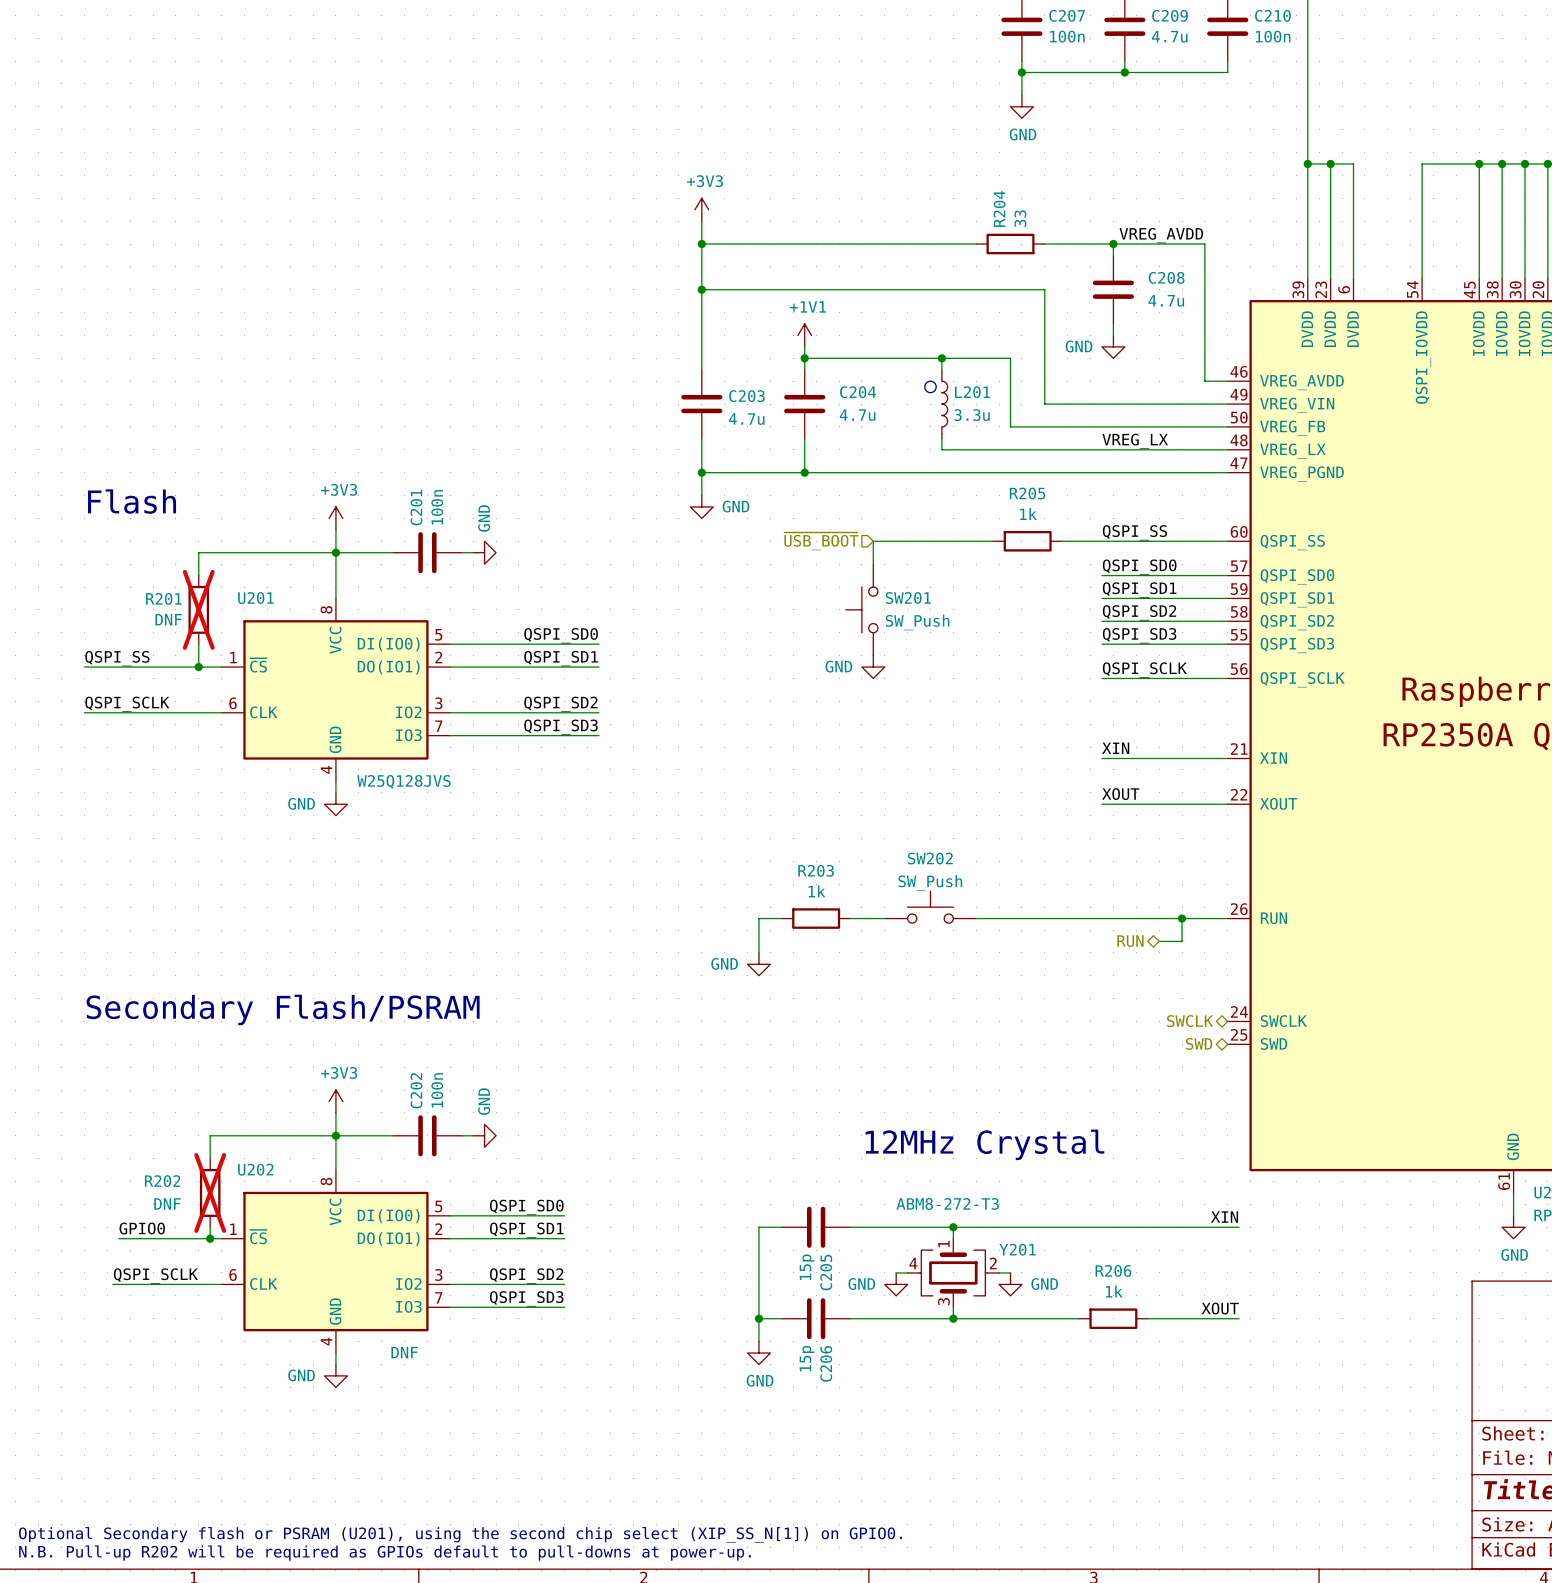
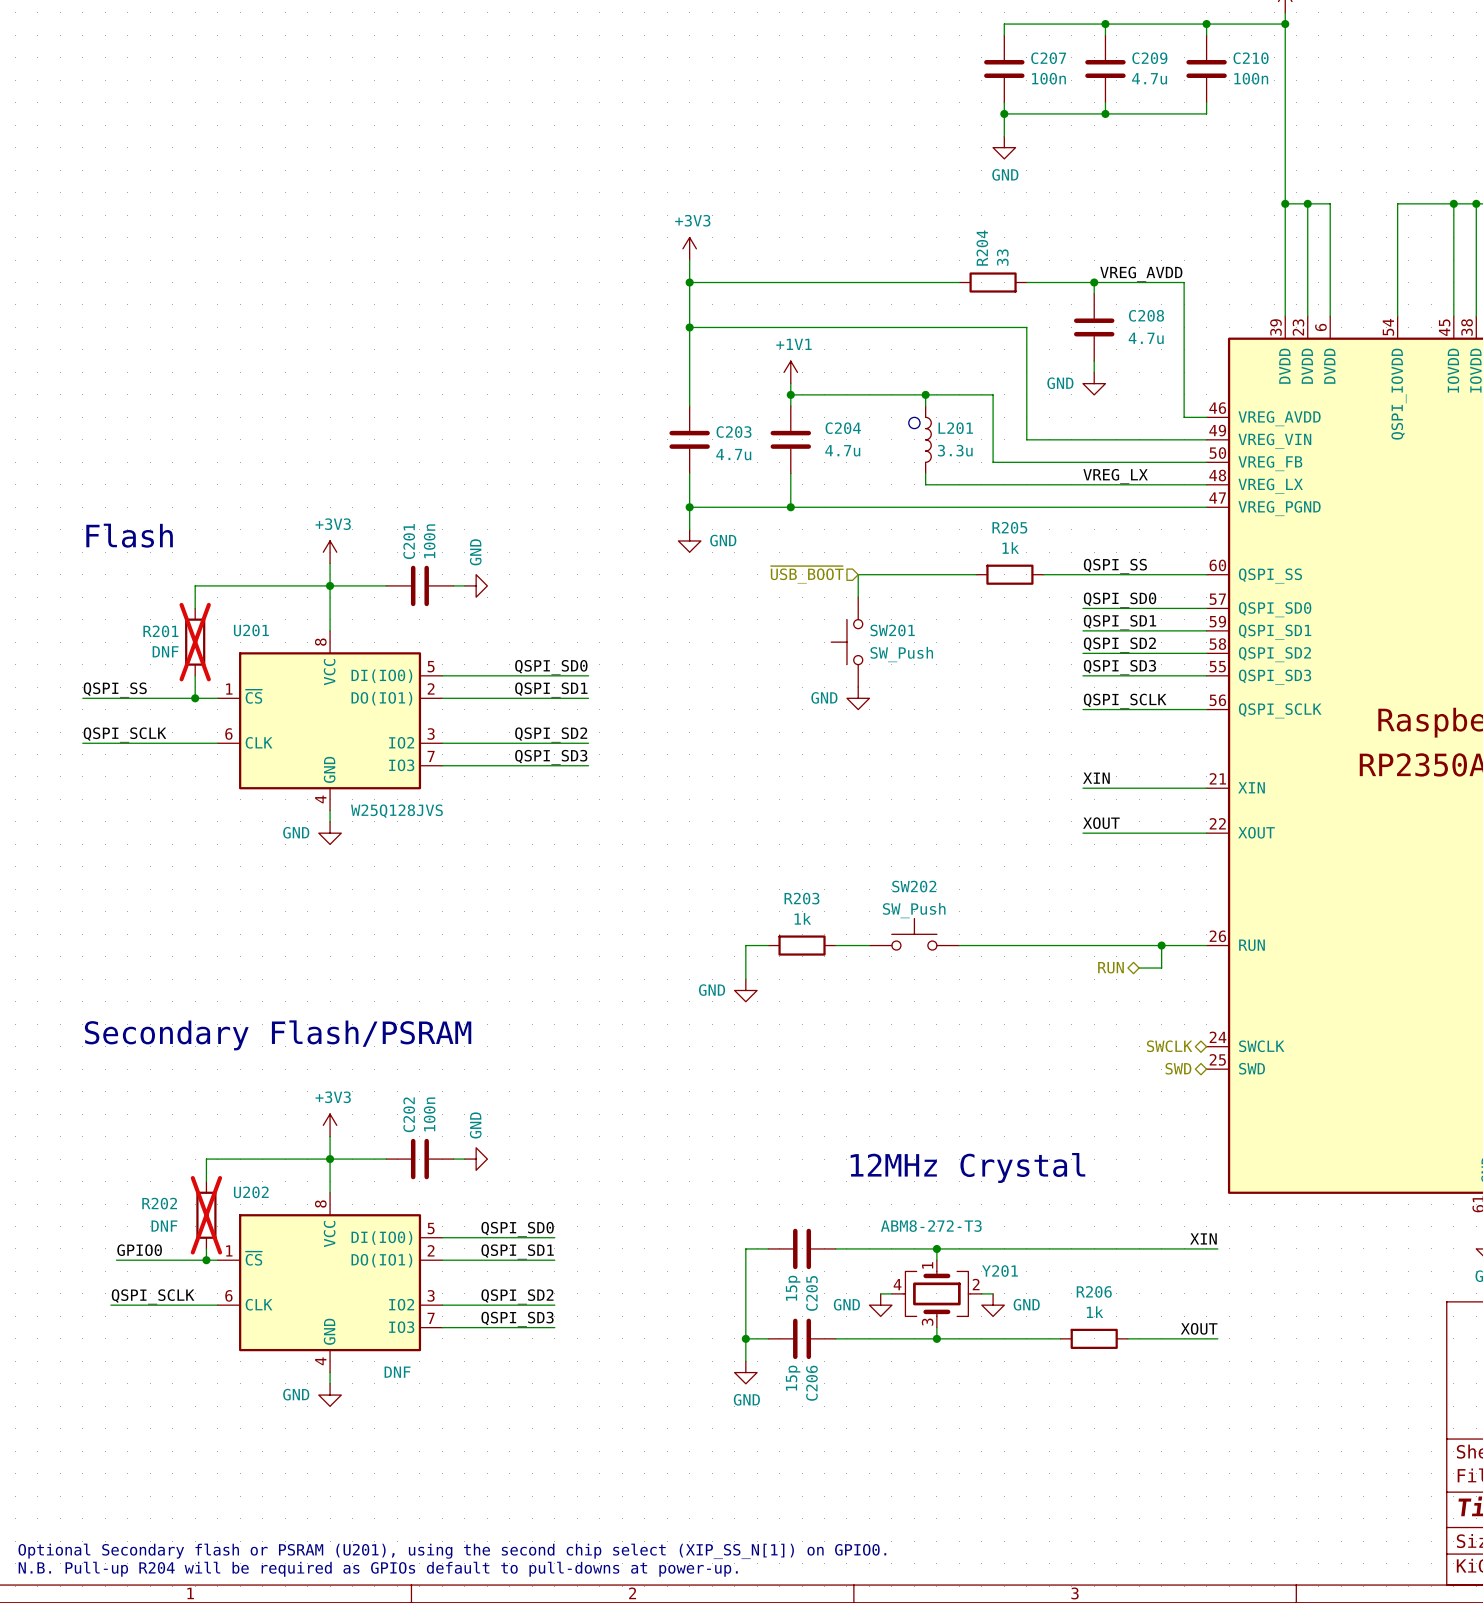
text: N.B. Pull-up R202 will be required as GPIOs default to pull-downs at power-up. (384, 1553) -> N.B. Pull-up R204 will be required as GPIOs default to pull-downs at power-up. (378, 1569)

